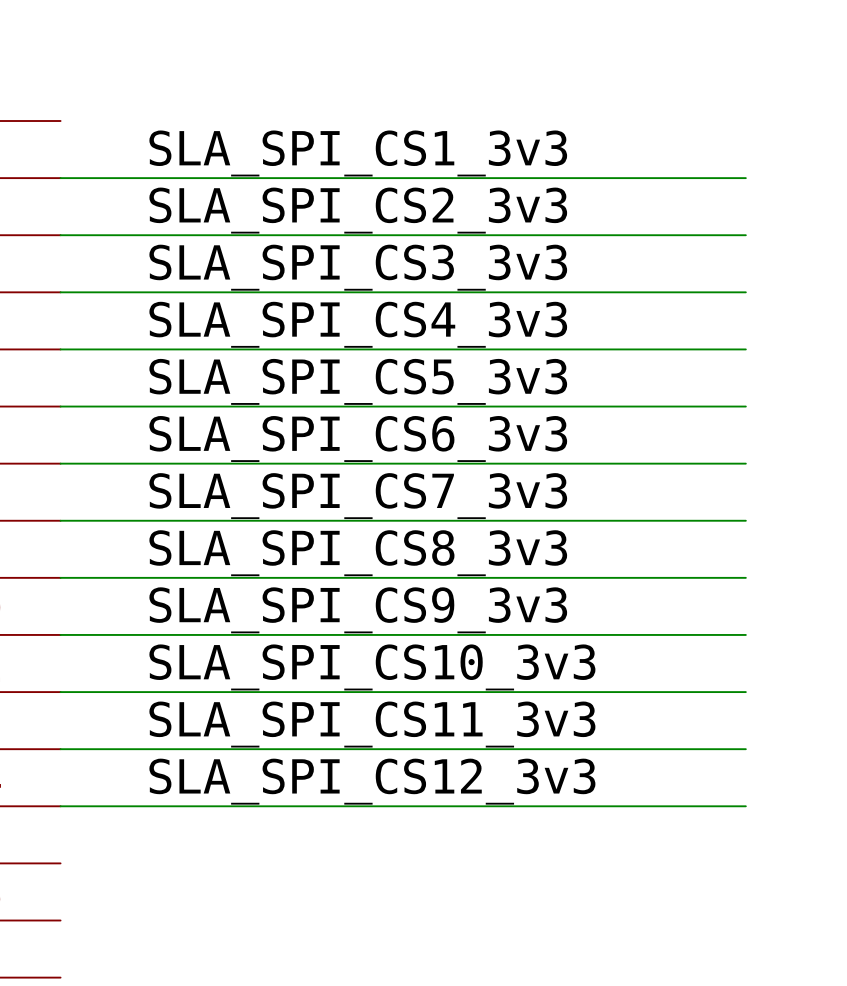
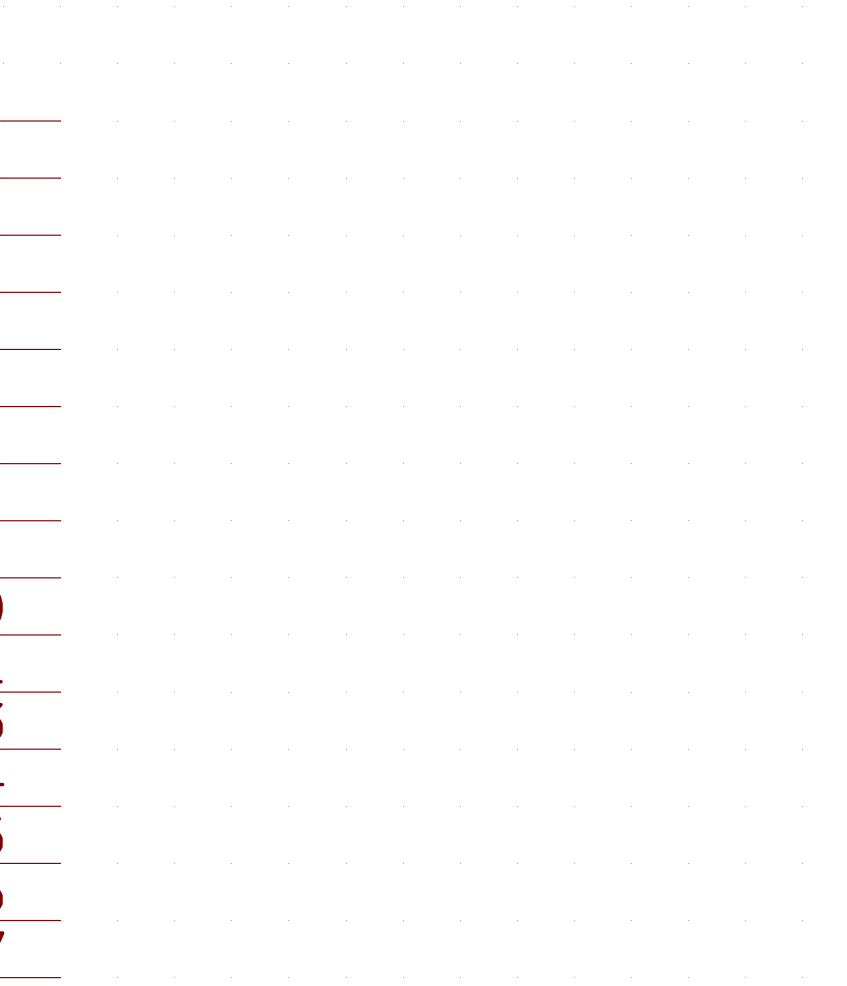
label: SLA_SPI_CS1_3v3 (358, 153) -> none
wire: (60, 178) (745, 178) -> none
label: SLA_SPI_CS2_3v3 (358, 210) -> none
wire: (60, 235) (745, 235) -> none
label: SLA_SPI_CS3_3v3 (358, 267) -> none
wire: (60, 292) (745, 292) -> none
label: SLA_SPI_CS4_3v3 (358, 324) -> none
wire: (60, 349) (745, 349) -> none
label: SLA_SPI_CS5_3v3 (358, 381) -> none
wire: (60, 406) (745, 406) -> none
label: SLA_SPI_CS6_3v3 (358, 438) -> none
wire: (60, 463) (745, 463) -> none
label: SLA_SPI_CS7_3v3 (358, 496) -> none
wire: (60, 520) (745, 520) -> none
label: SLA_SPI_CS8_3v3 (358, 553) -> none
wire: (60, 577) (745, 577) -> none
label: SLA_SPI_CS9_3v3 (358, 610) -> none
wire: (60, 634) (745, 634) -> none
label: SLA_SPI_CS10_3v3 (372, 667) -> none
wire: (60, 692) (745, 692) -> none
label: SLA_SPI_CS11_3v3 (372, 724) -> none
wire: (60, 749) (745, 749) -> none
label: SLA_SPI_CS12_3v3 (372, 781) -> none
wire: (60, 806) (745, 806) -> none

